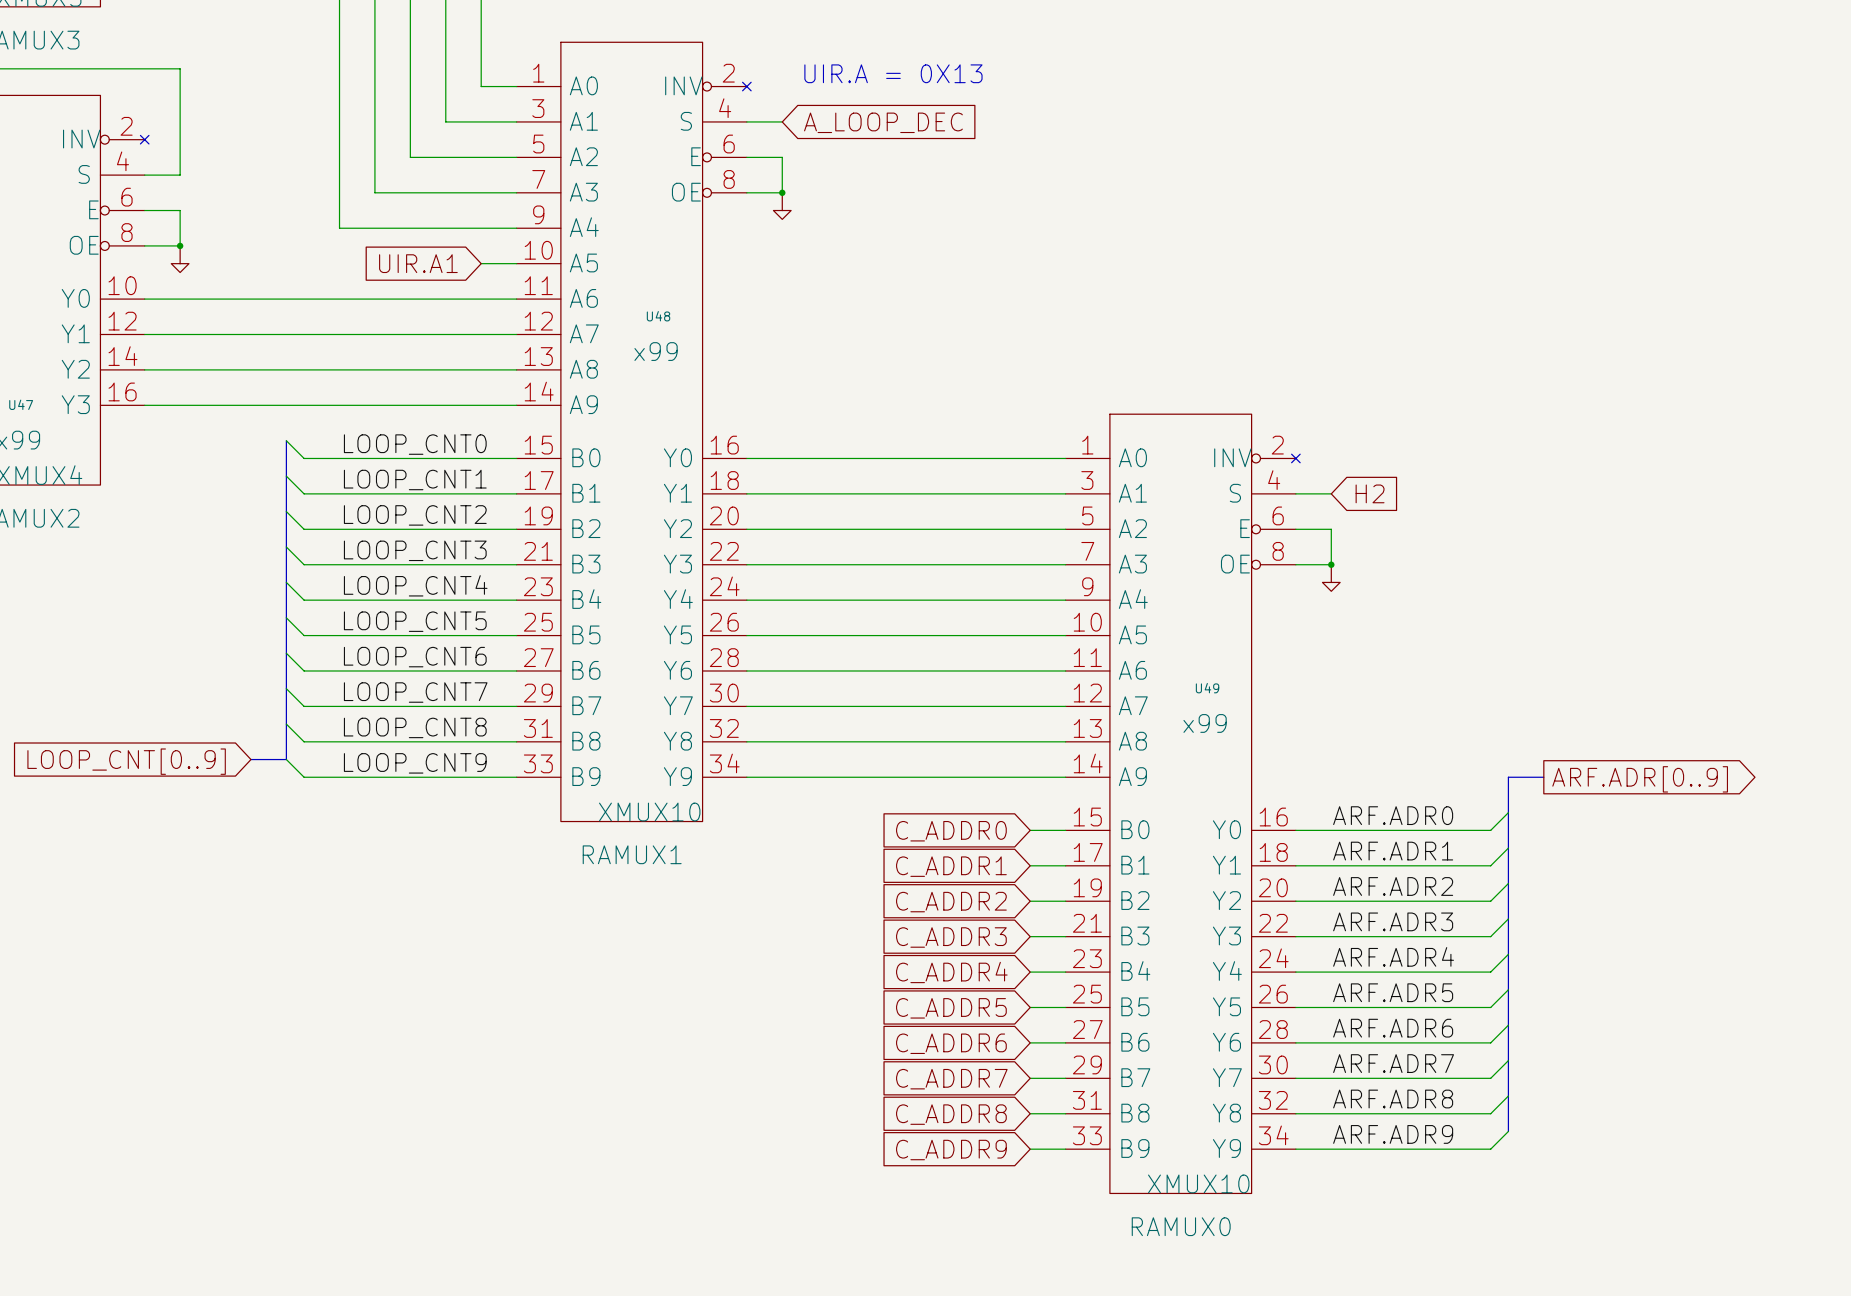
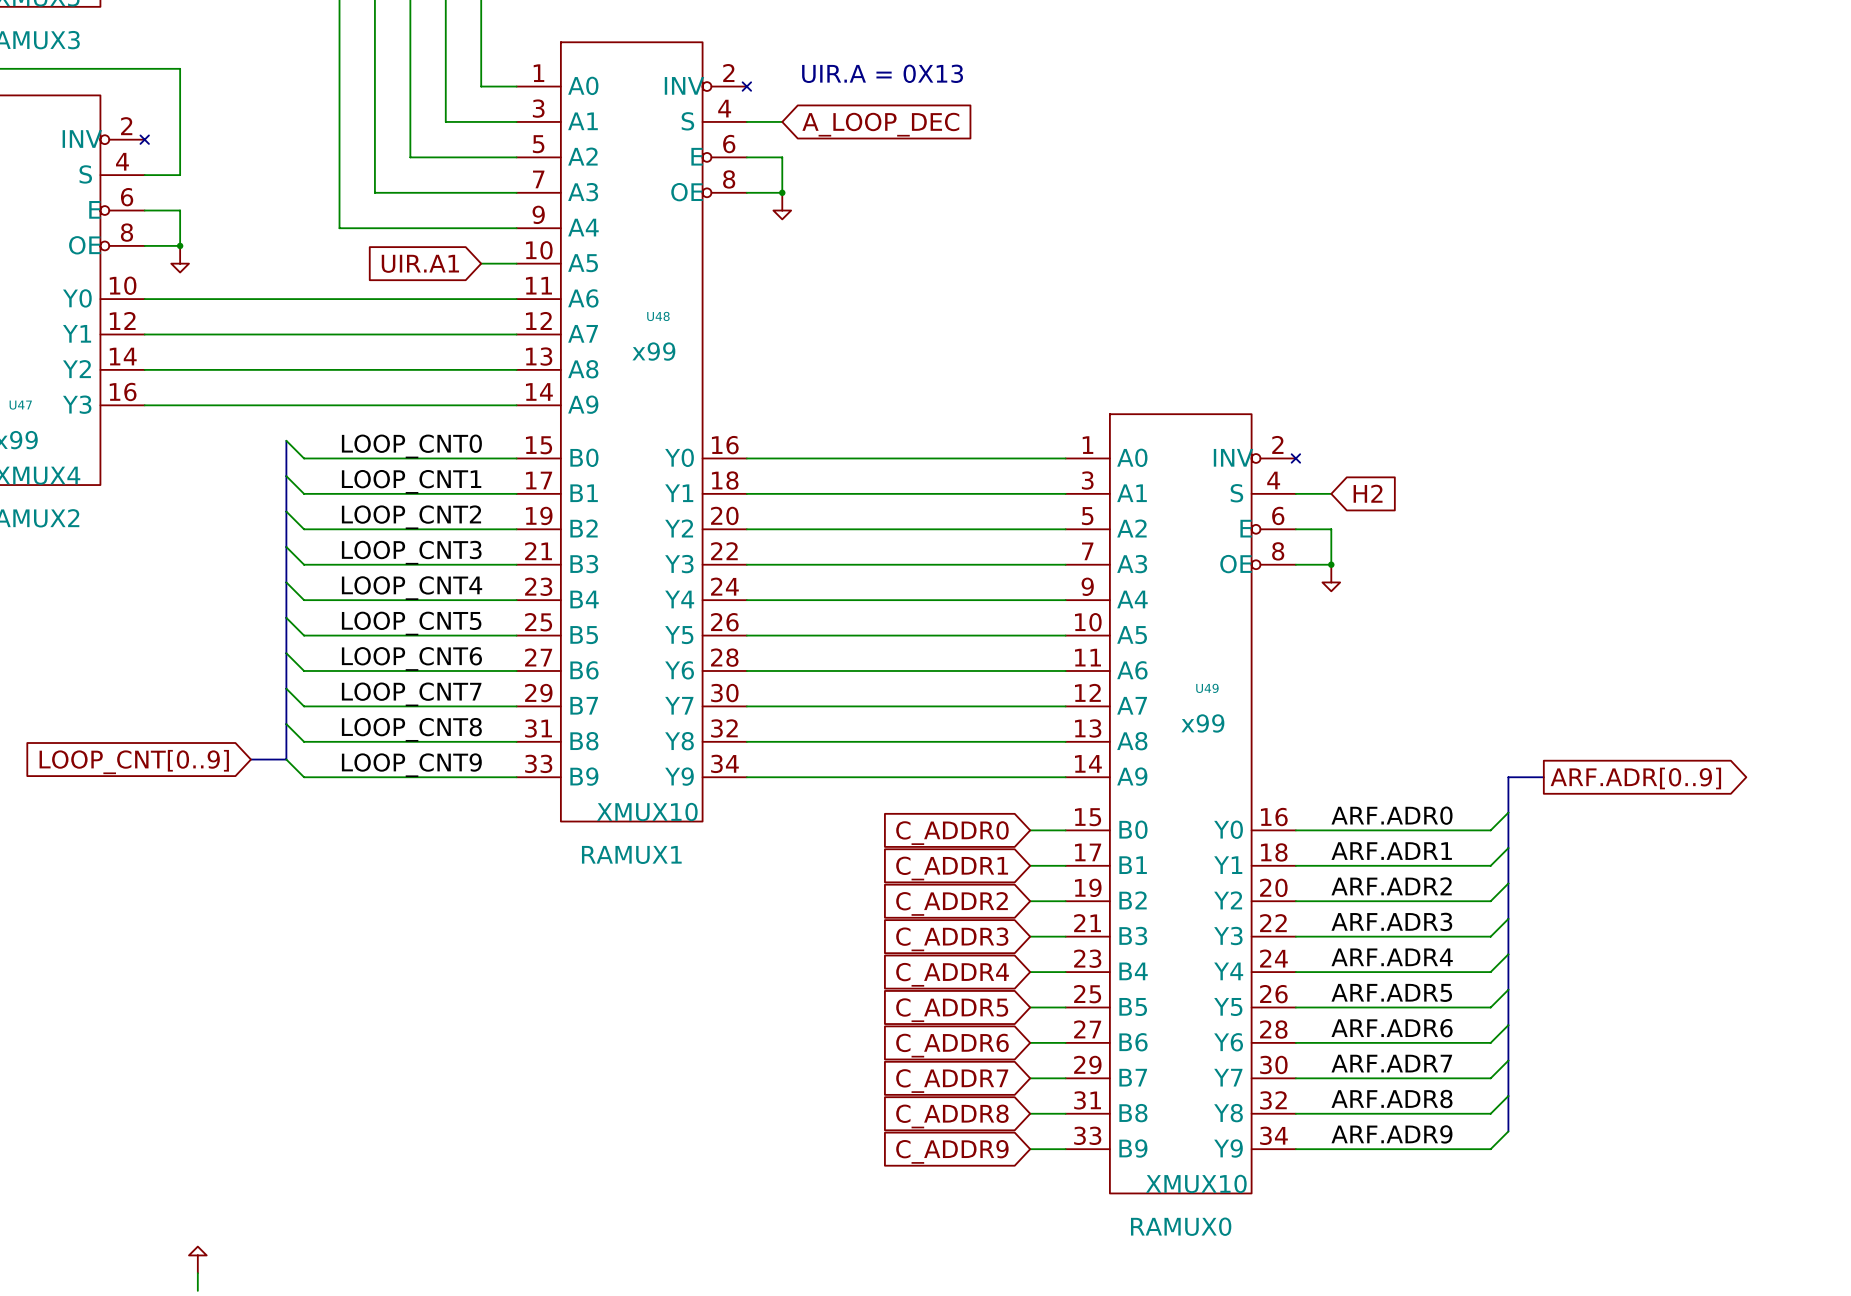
power symbol: none -> (197, 1259)
wire: none -> (197, 1273) (197, 1290)

